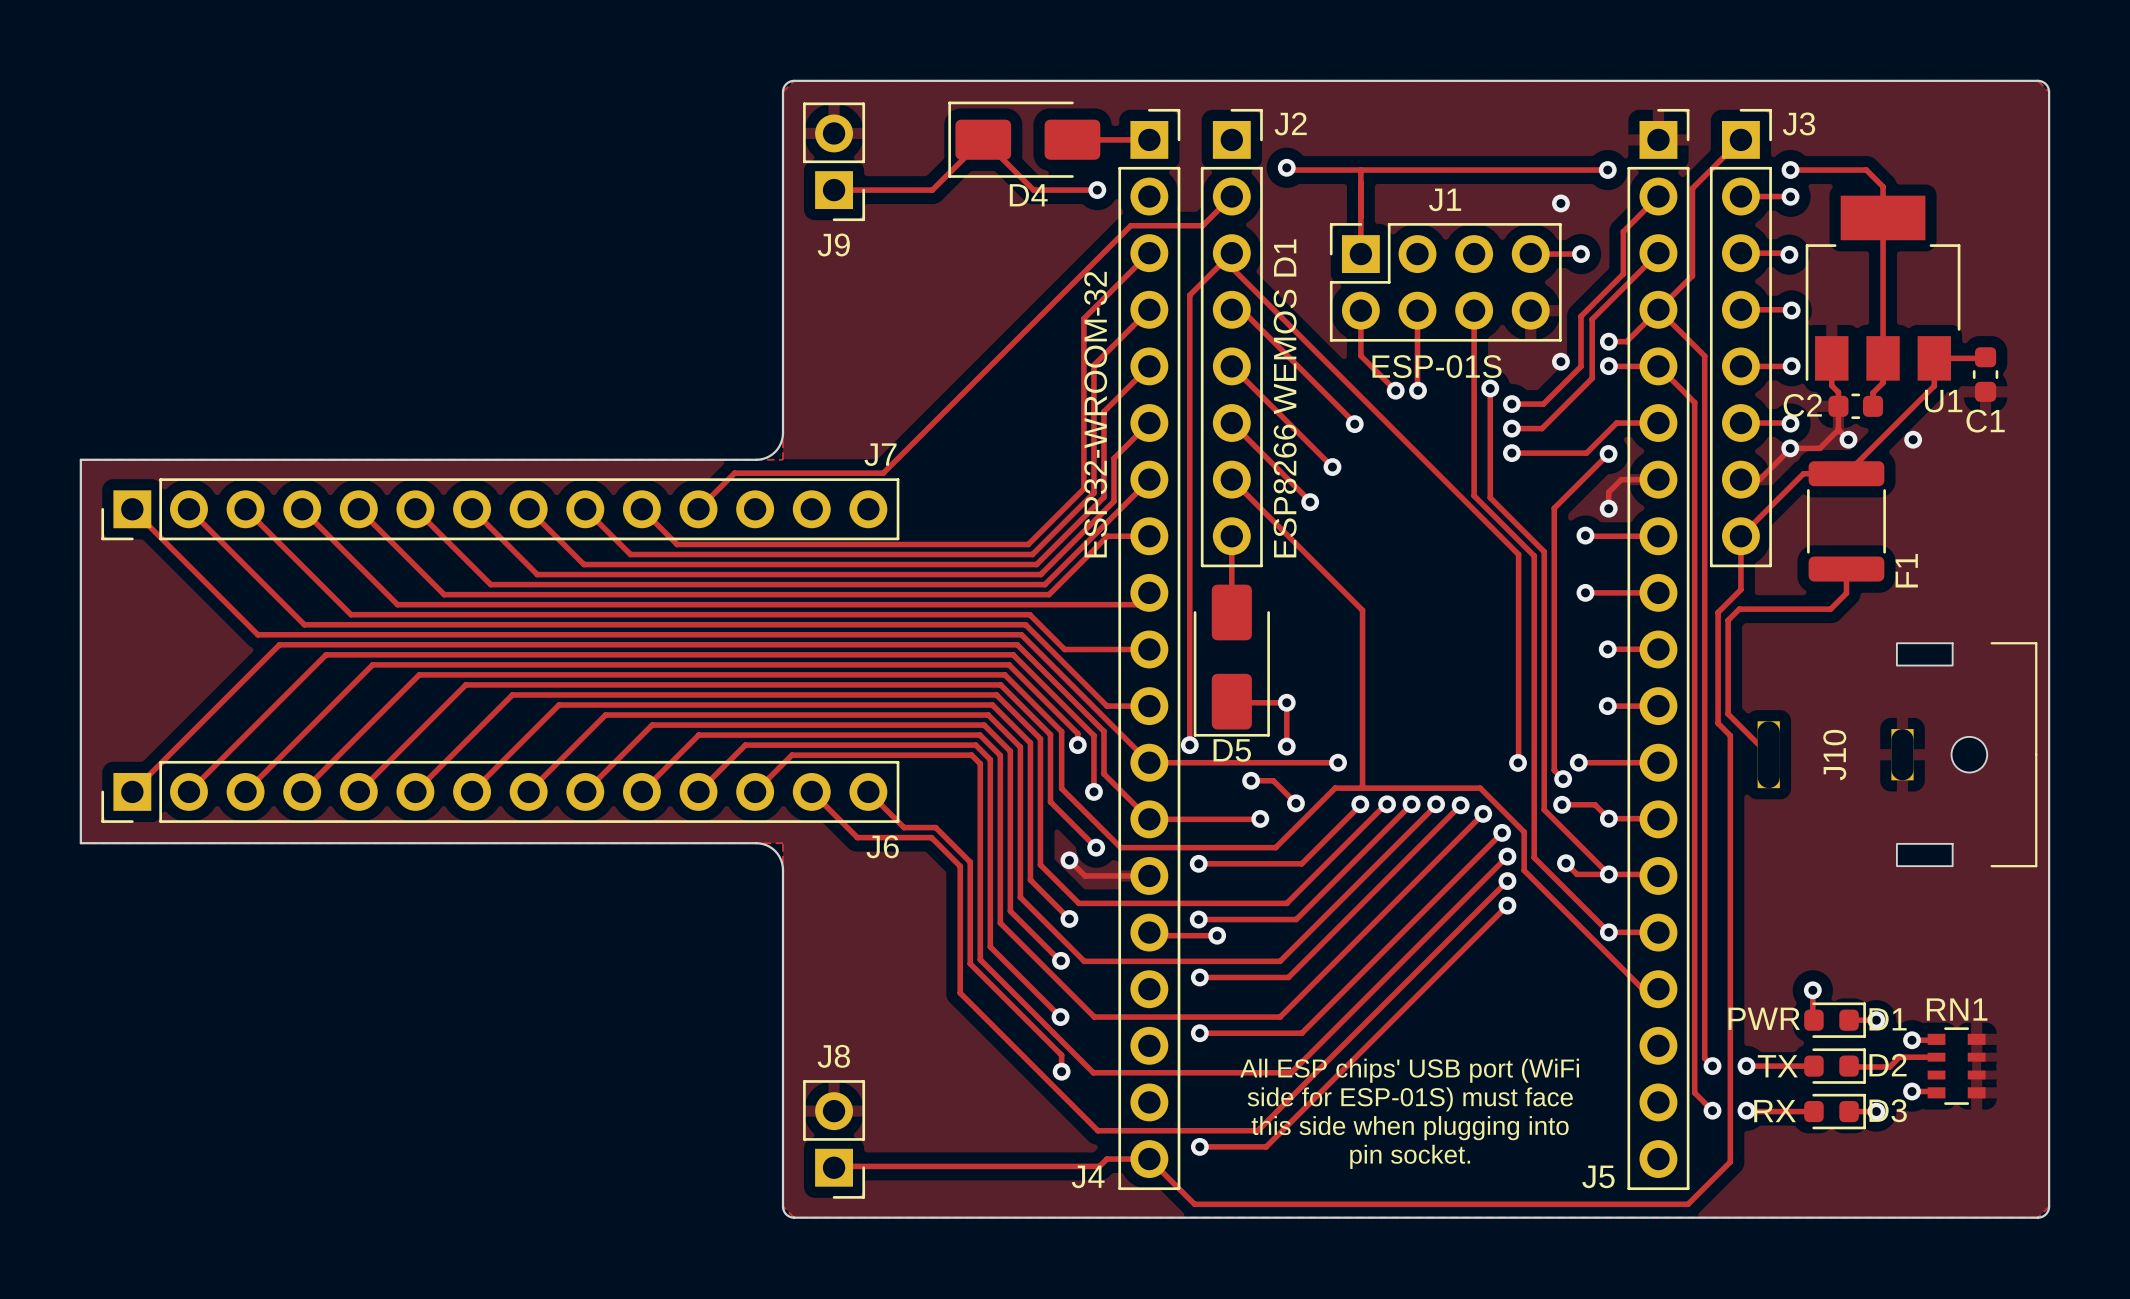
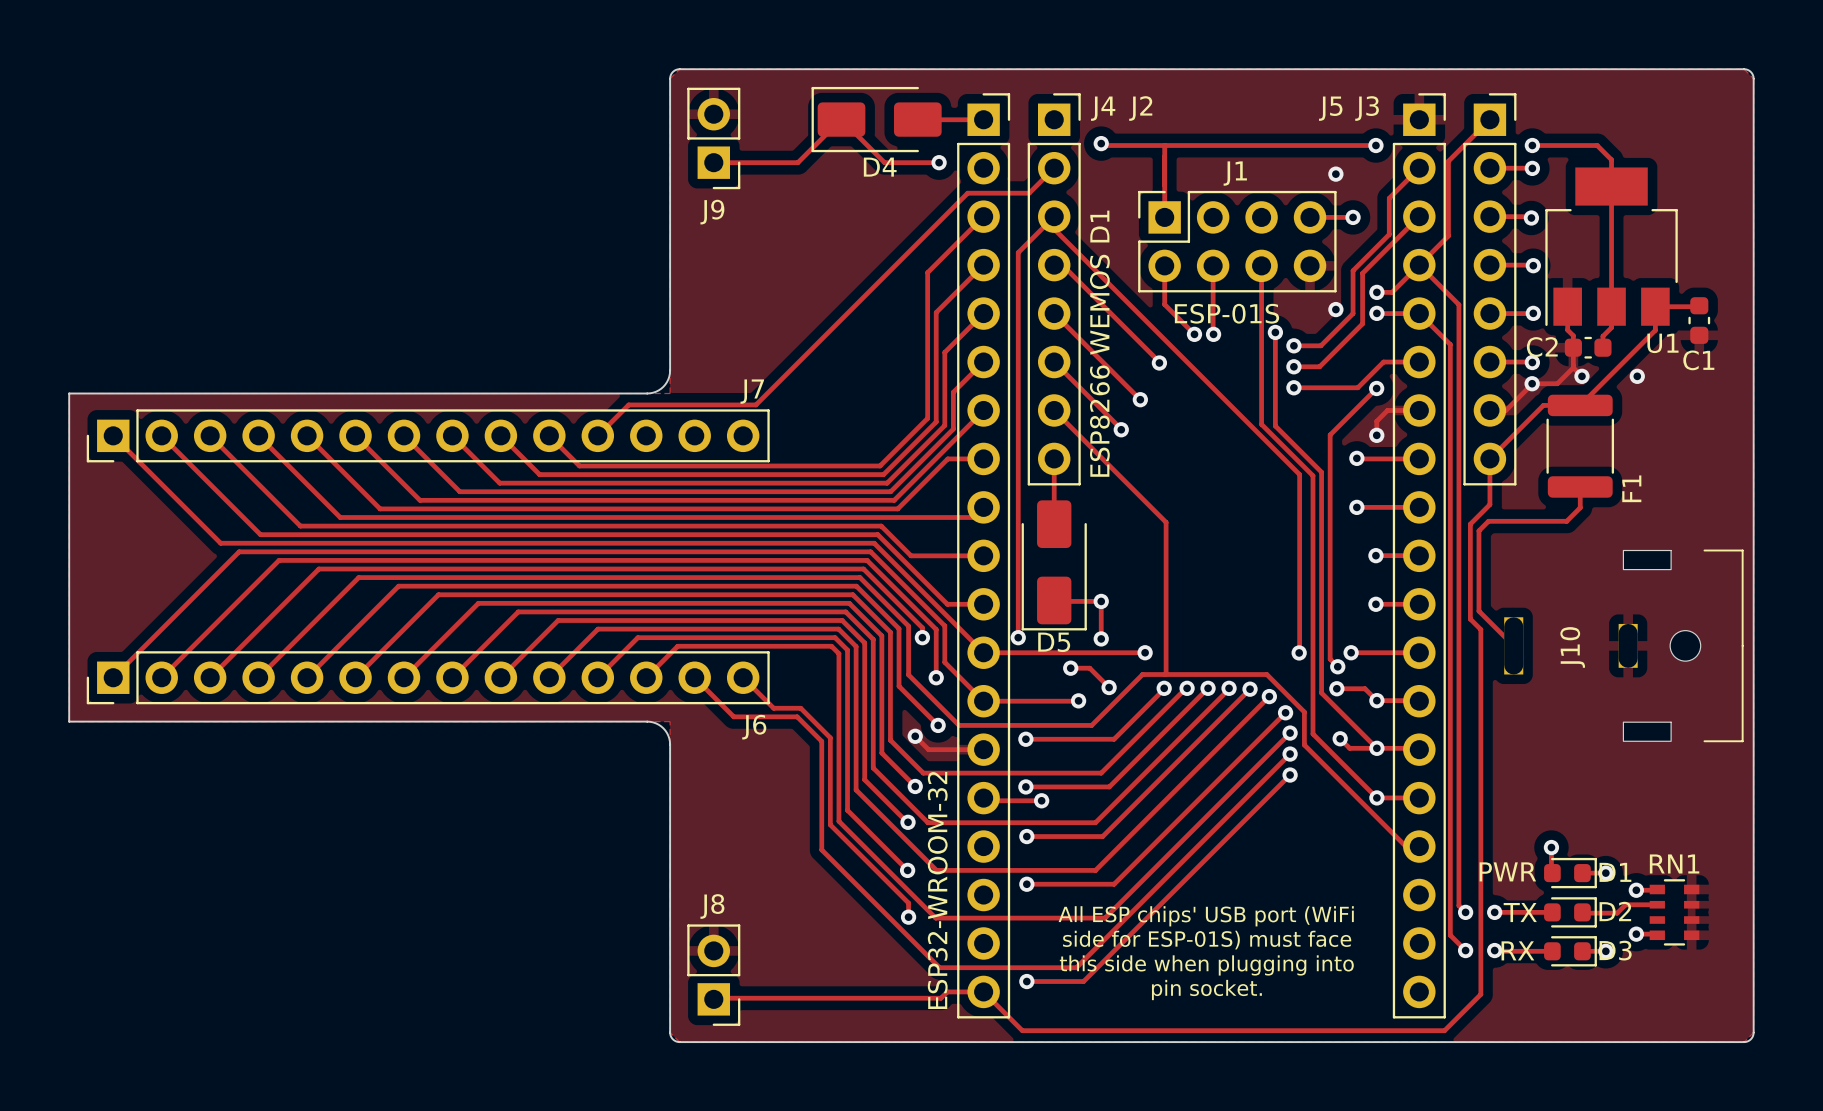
J2 name position: J2 (1290, 123) -> J2 (1140, 108)
J3 name position: J3 (1798, 123) -> J3 (1367, 108)
text: ESP32-WROOM-32 (1095, 414) -> none
text: none -> ESP32-WROOM-32 (937, 890)
J4 name position: J4 (1088, 1176) -> J4 (1103, 108)
J5 name position: J5 (1598, 1176) -> J5 (1330, 108)

